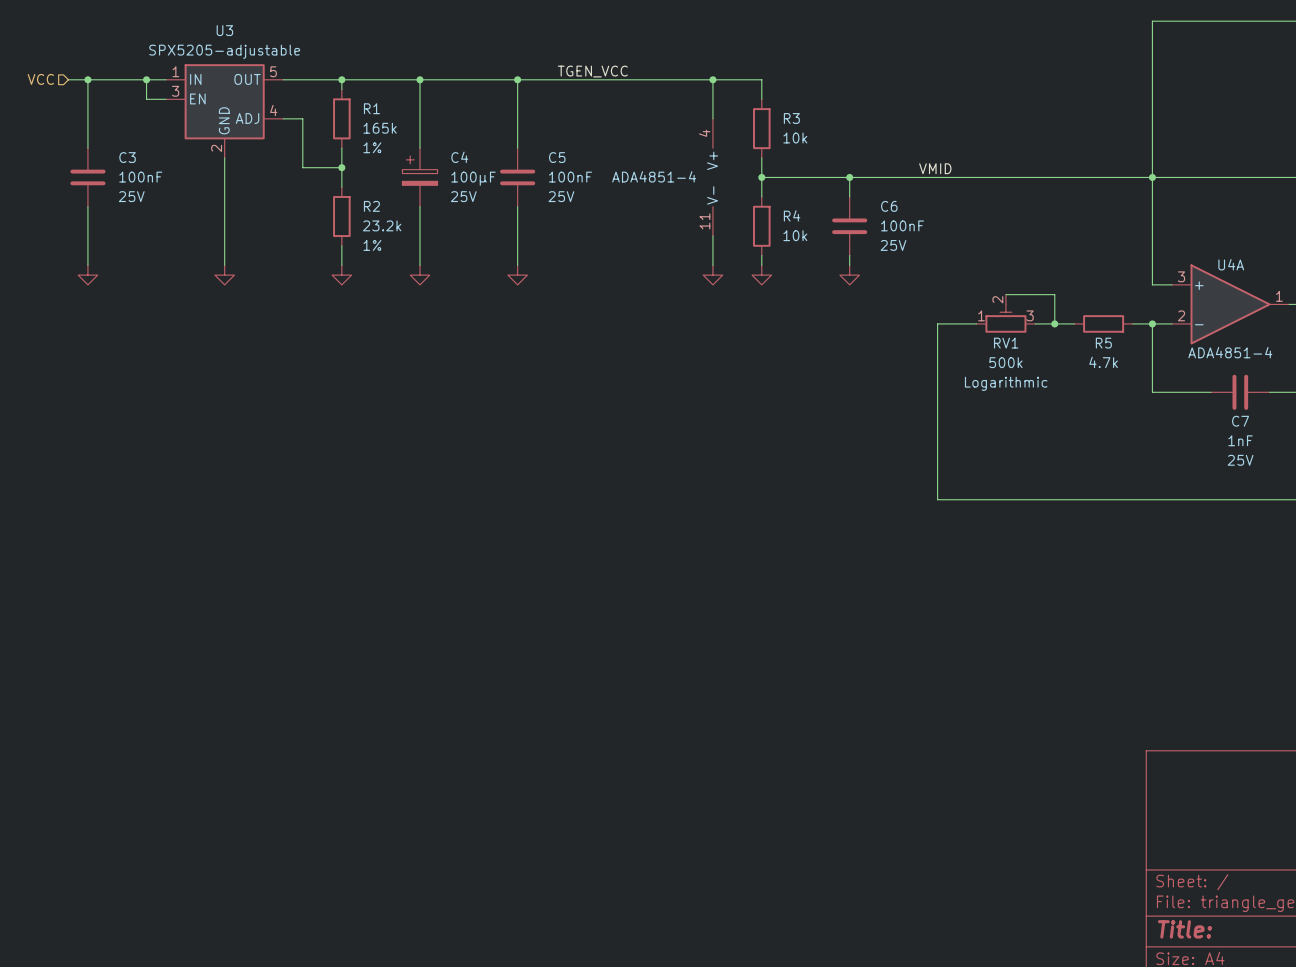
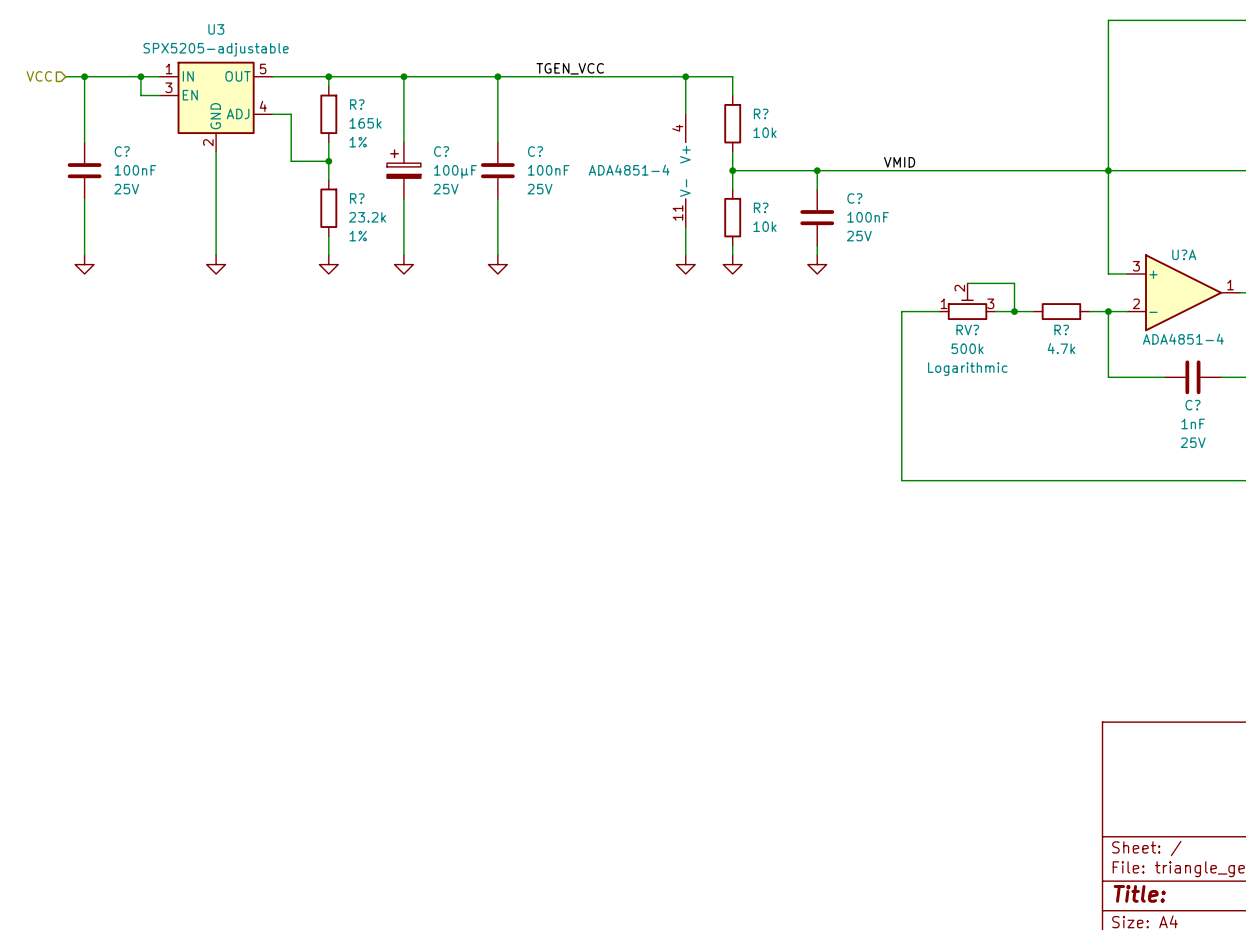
R1 name: R1 (371, 108) -> R? (357, 104)
R3 name: R3 (791, 118) -> R? (761, 113)
C3 name: C3 (127, 157) -> C? (122, 151)
C4 name: C4 (459, 157) -> C? (441, 151)
C5 name: C5 (557, 157) -> C? (535, 151)
R2 name: R2 (371, 206) -> R? (357, 198)
C6 name: C6 (889, 206) -> C? (854, 198)
R4 name: R4 (792, 215) -> R? (761, 207)
U4A name: U4A (1231, 264) -> U?A (1184, 254)
RV1 name: RV1 (1006, 343) -> RV? (967, 330)
R5 name: R5 (1103, 343) -> R? (1061, 330)
C7 name: C7 (1240, 421) -> C? (1192, 405)

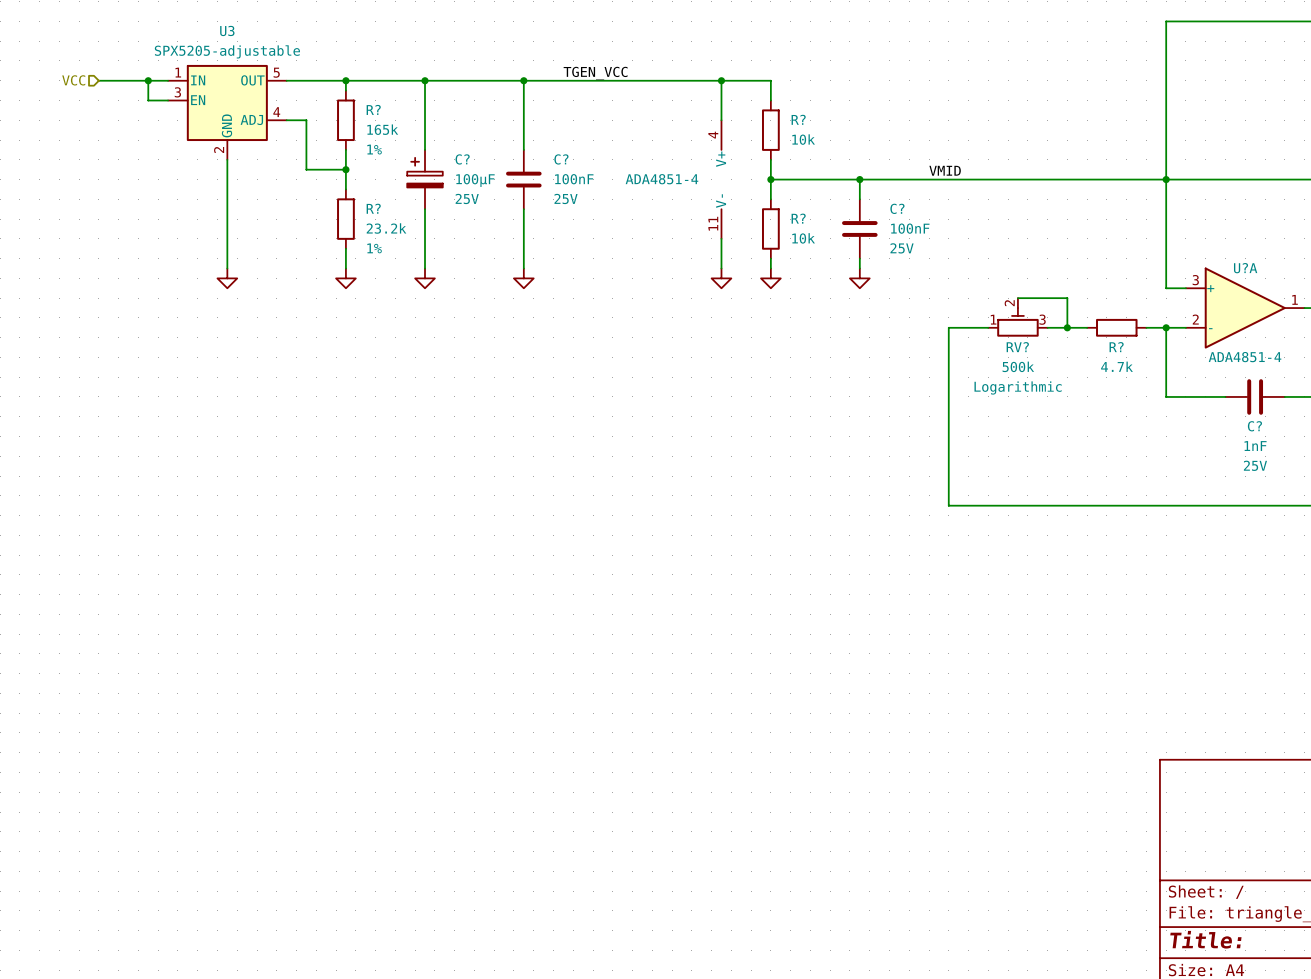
hierarchical label position: VCC (39, 76) -> VCC (73, 80)
wire: (65, 76) (93, 76) -> none
wire: (84, 76) (84, 142) -> none
junction: (84, 76) -> none
C?: 100nF (84, 170) -> none
wire: (84, 198) (84, 255) -> none
power symbol: (84, 264) -> none

